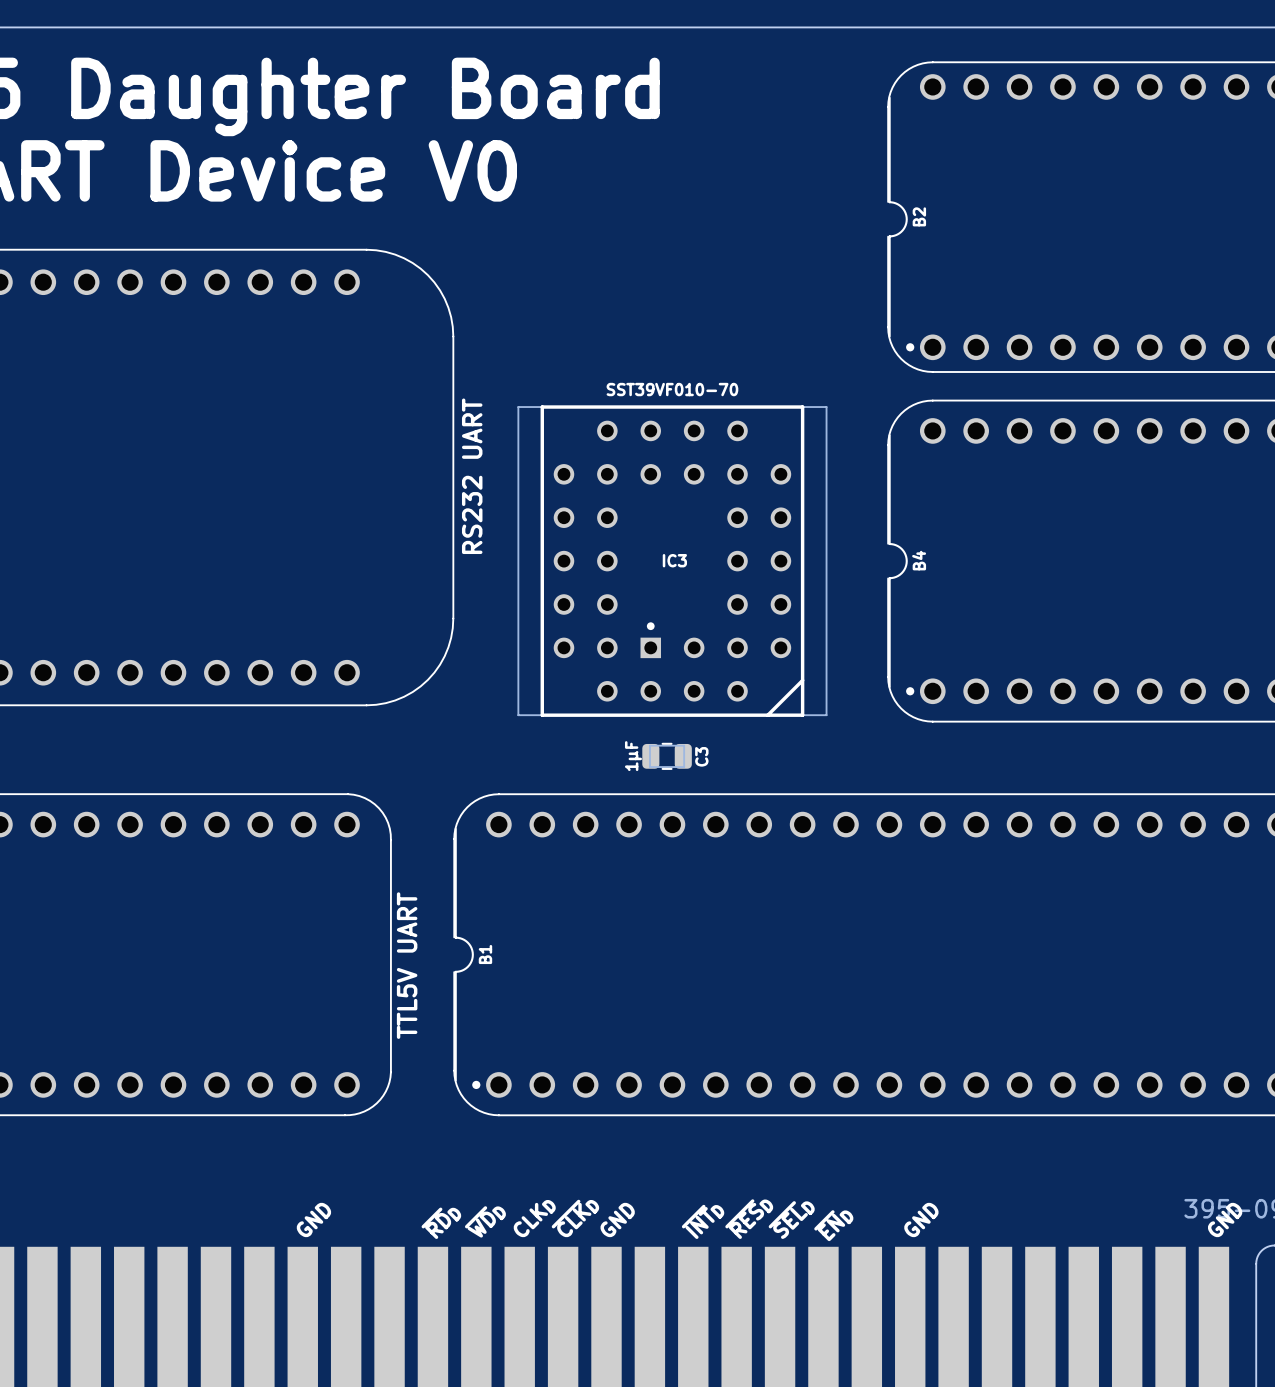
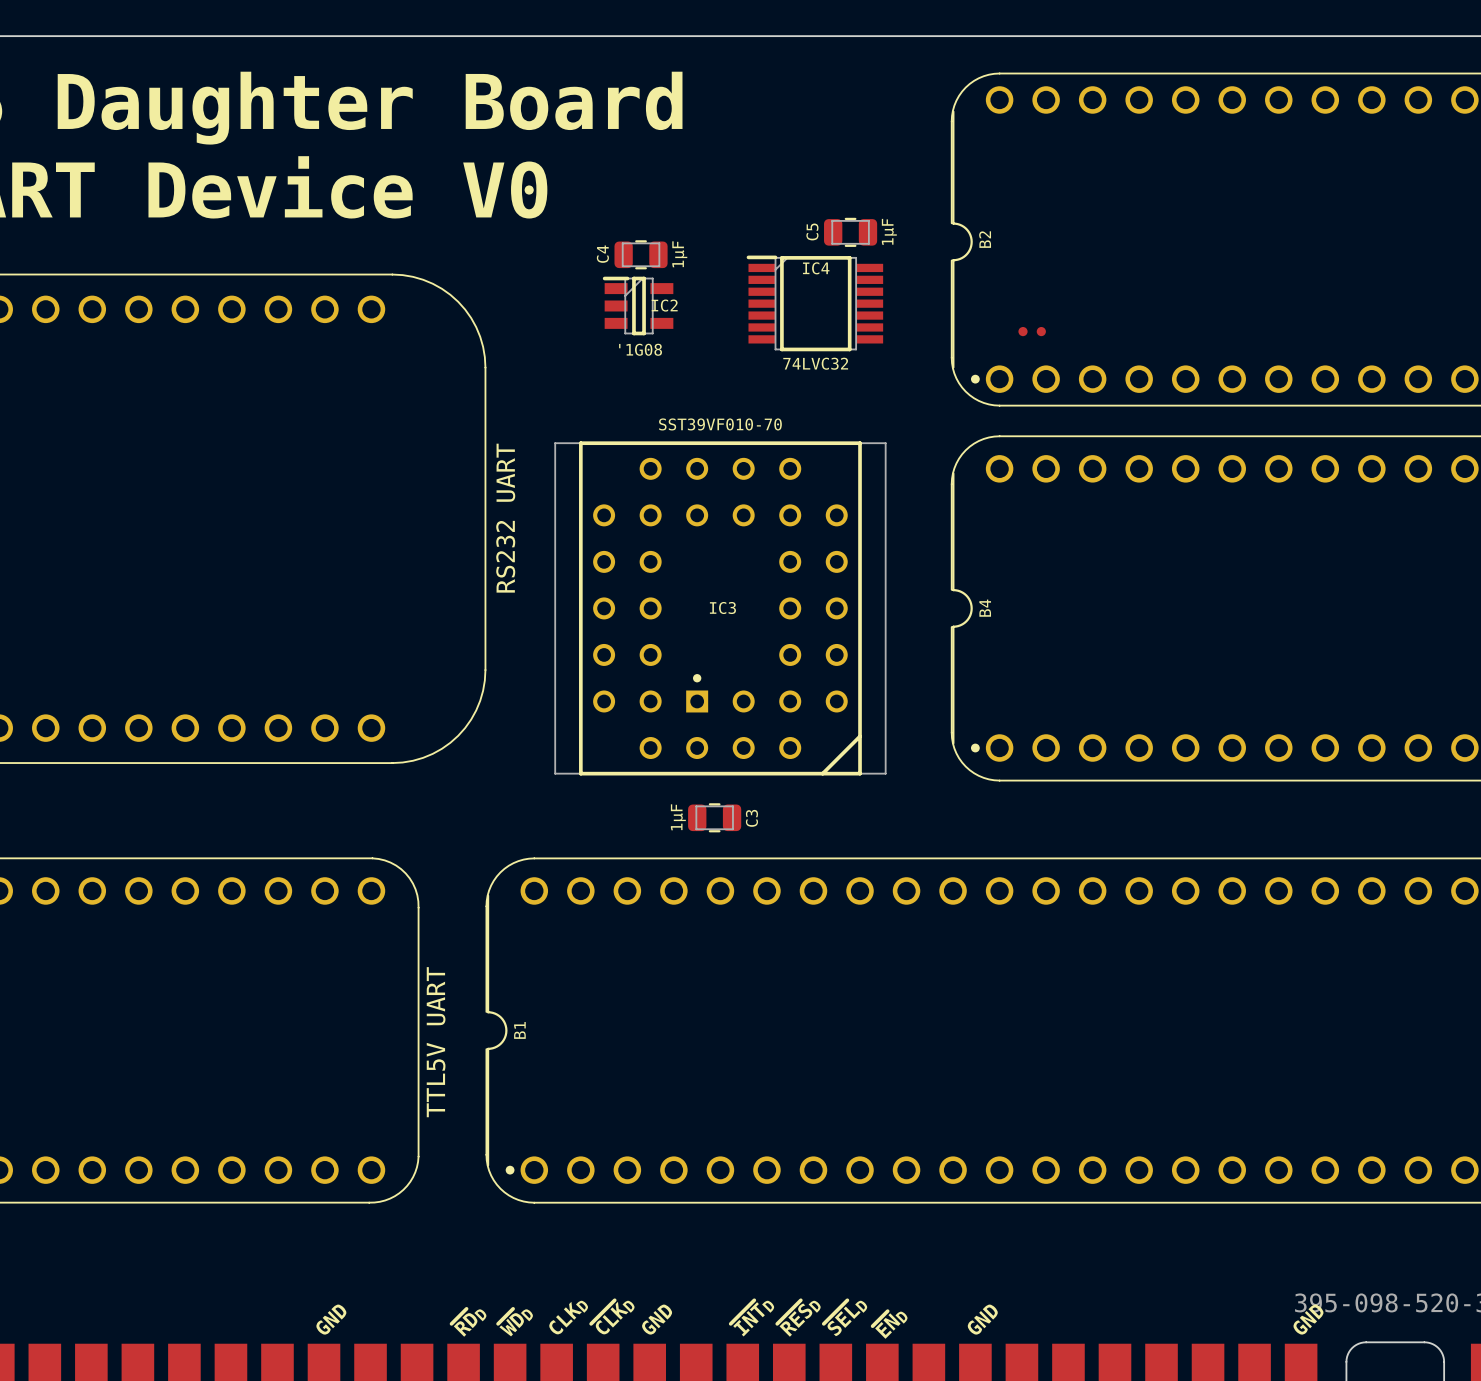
C5: none -> 1μF (850, 232)
C4: none -> 1μF (641, 254)
IC4: none -> (814, 303)
IC2: none -> (638, 305)
part: none -> (1032, 331)

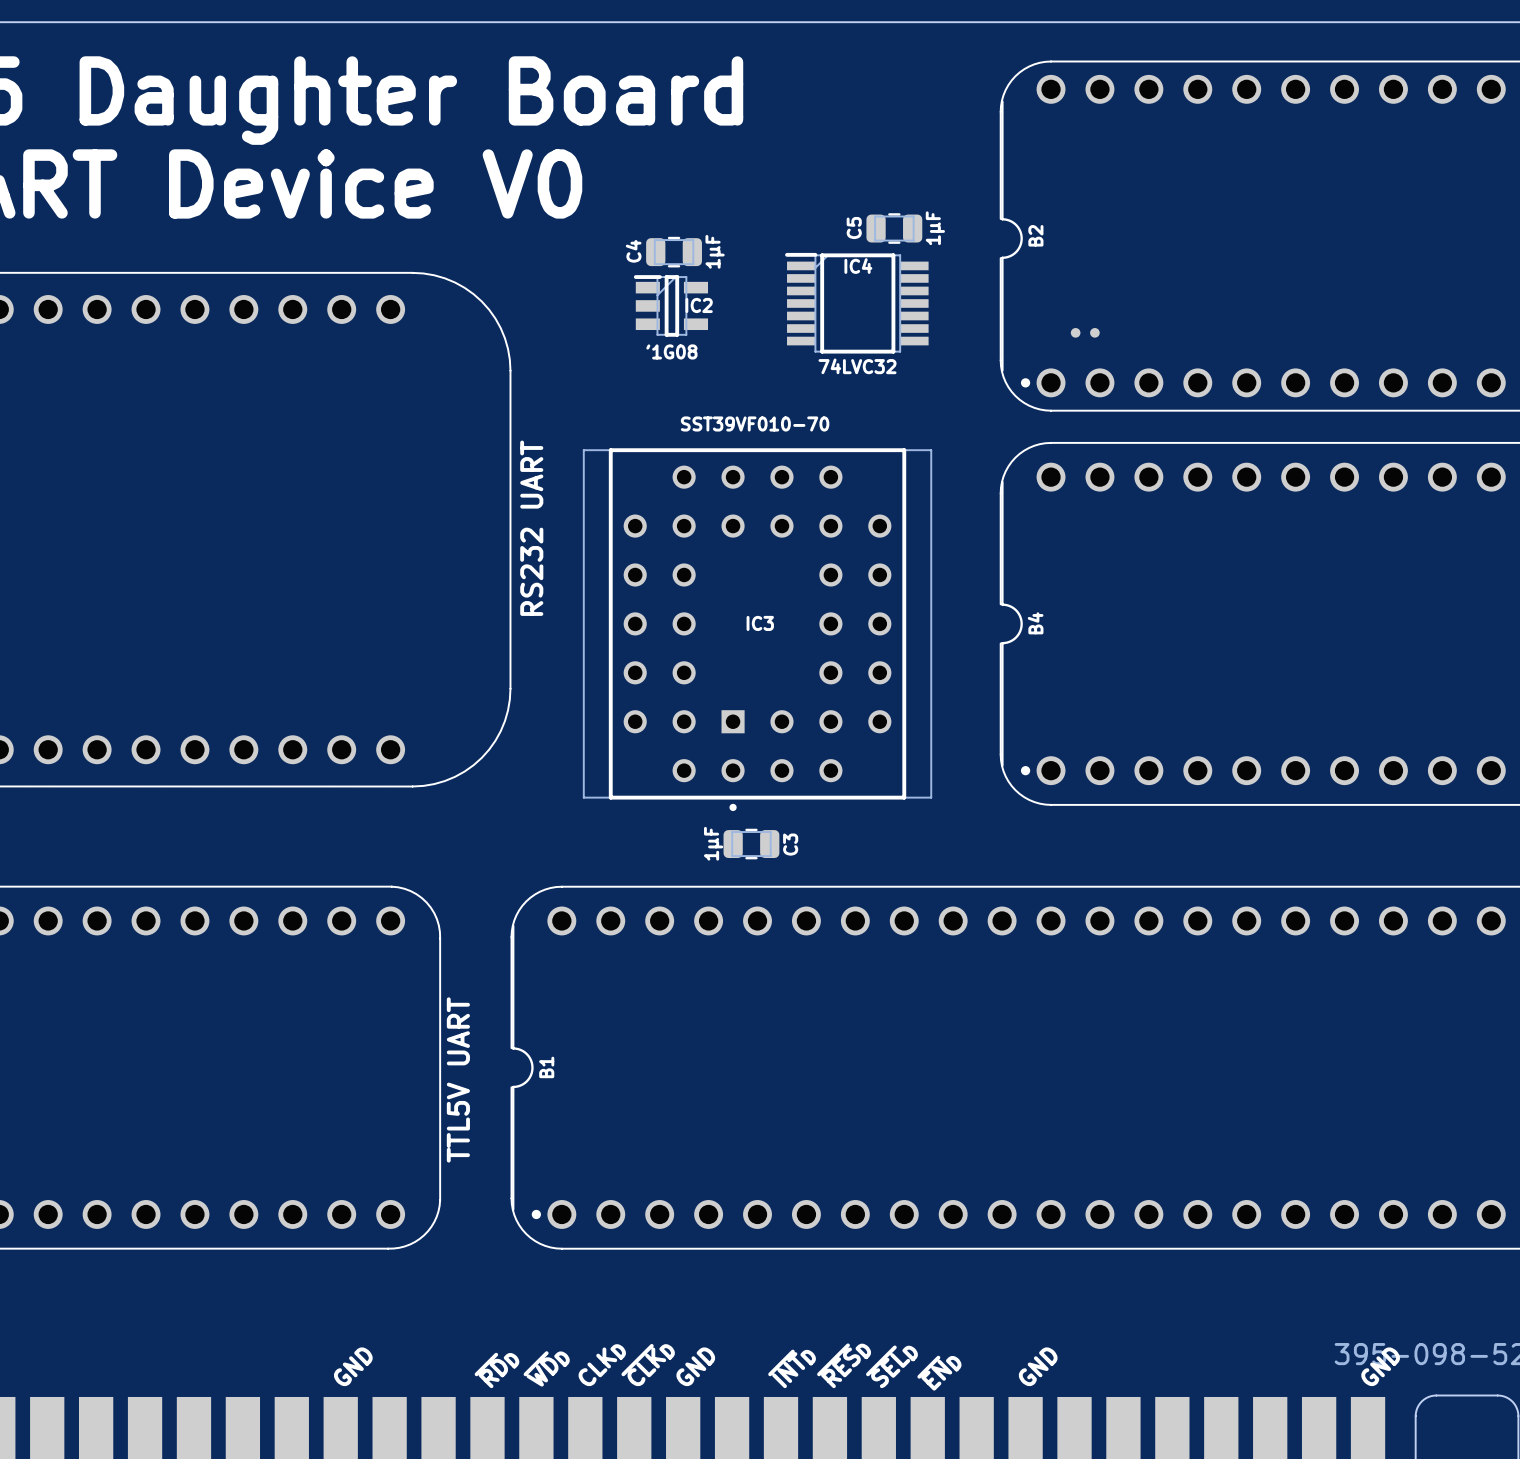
IC3 footprint: [554, 441, 887, 776] -> [582, 448, 933, 812]

